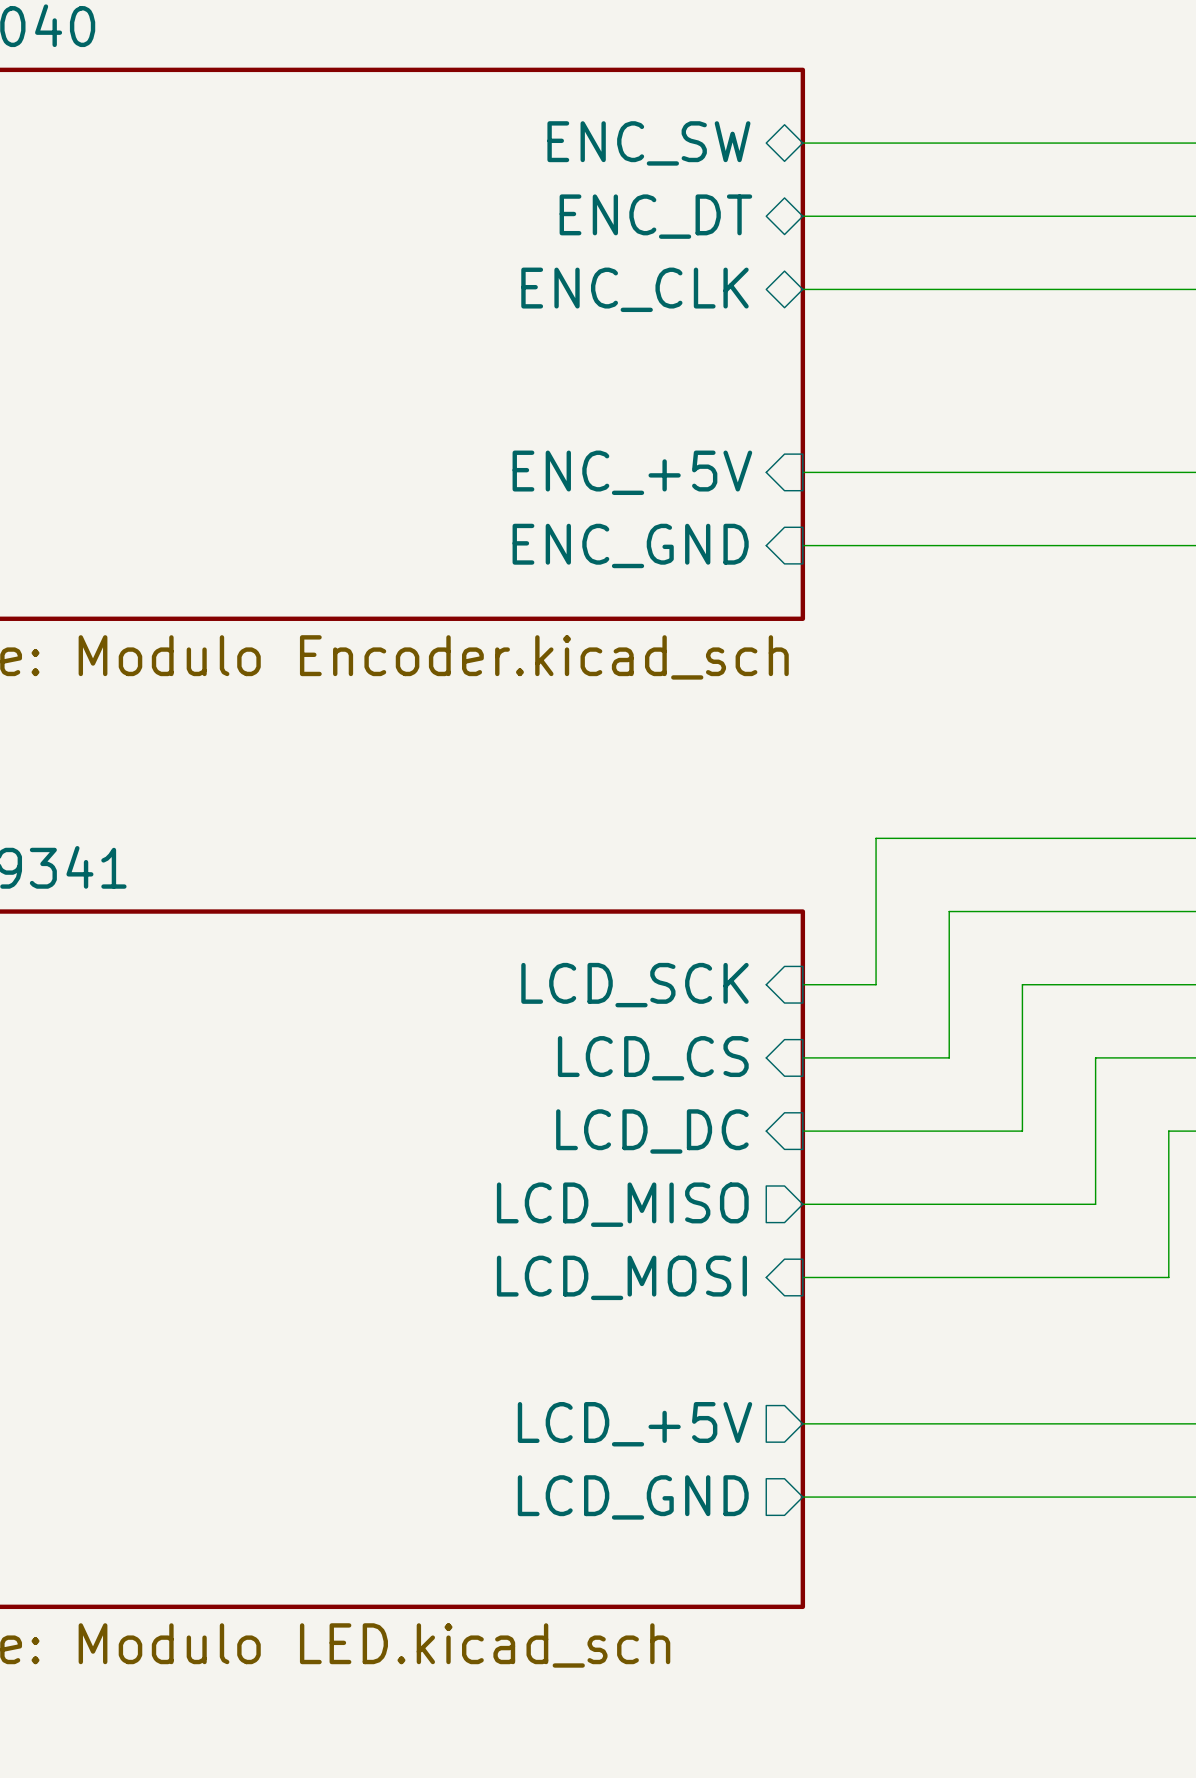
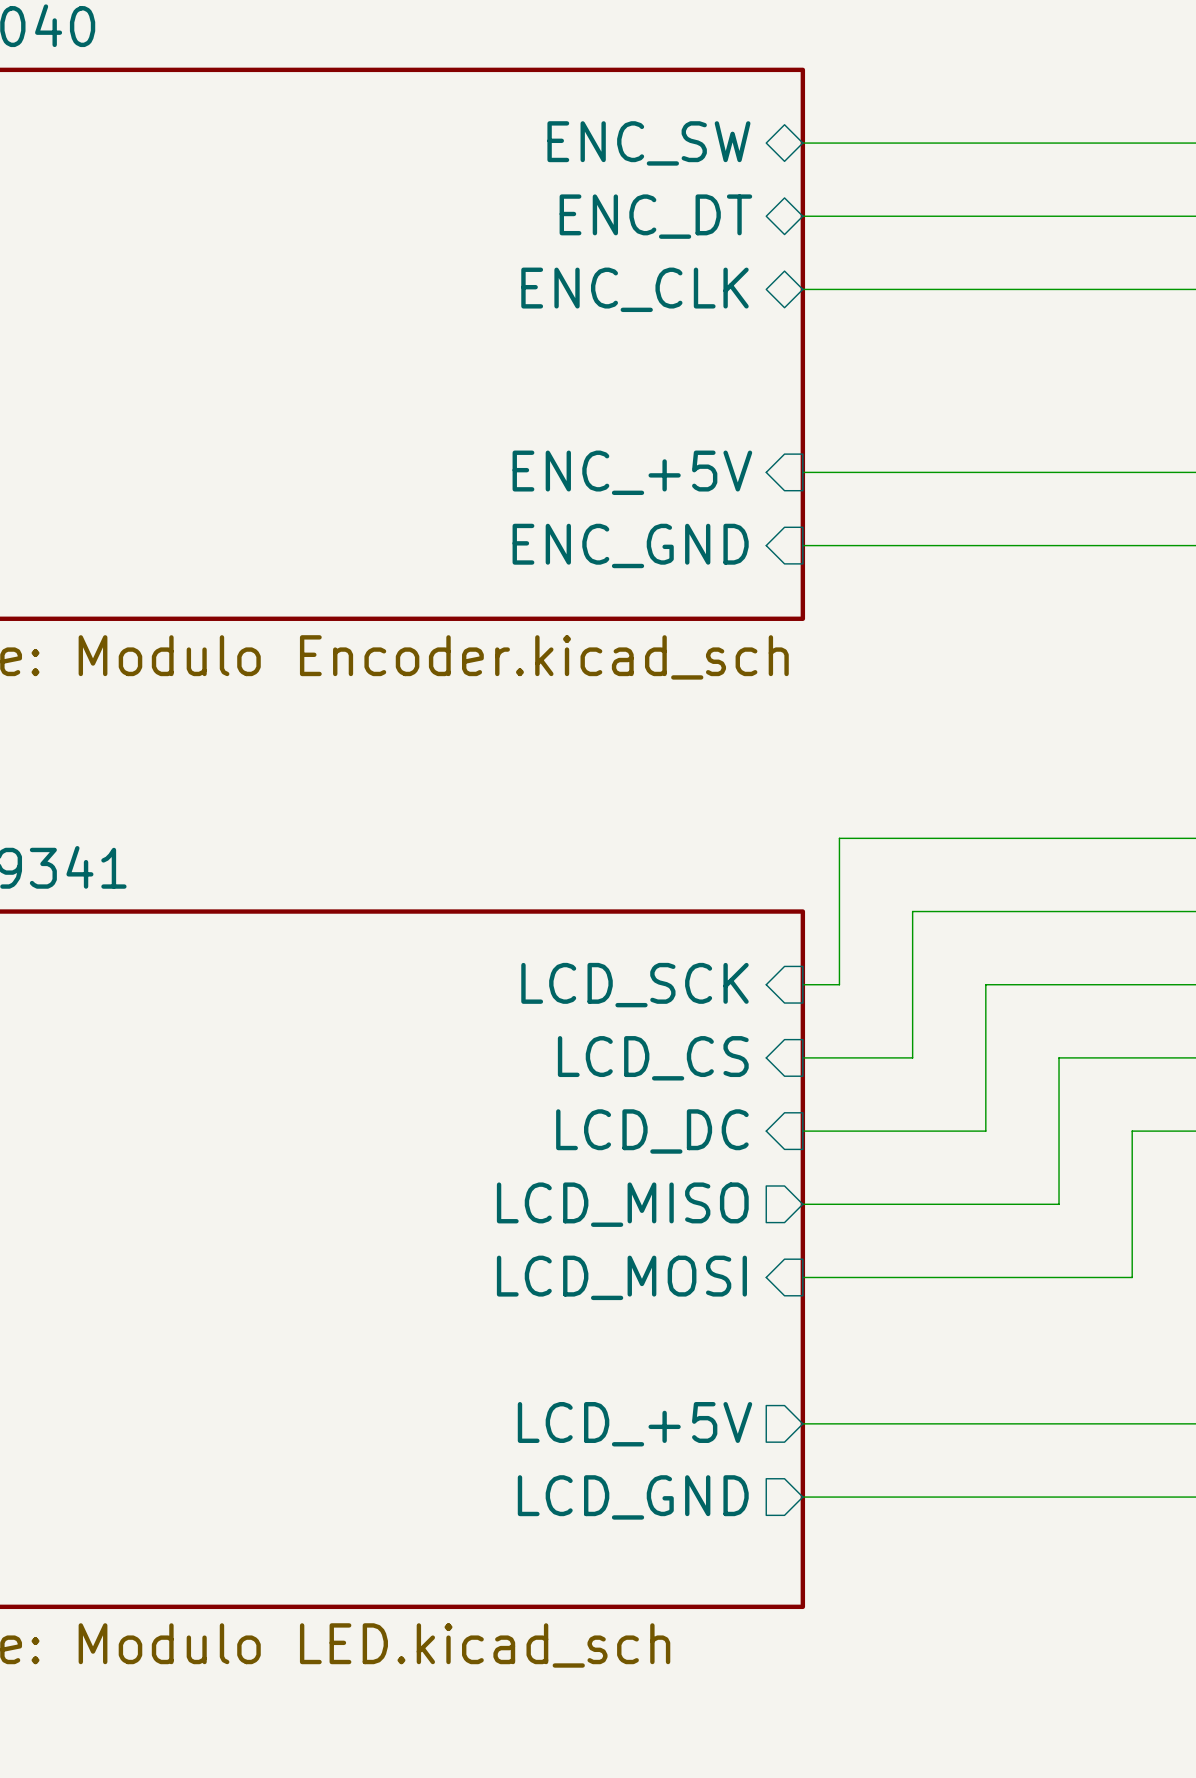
wire: (876, 838) (876, 984) (839, 984) -> (876, 838) (839, 838) (839, 984)
wire: (949, 911) (949, 1057) (912, 1057) -> (949, 911) (912, 911) (912, 1057)
wire: (1022, 984) (1022, 1131) (985, 1131) -> (1022, 984) (985, 984) (985, 1131)
wire: (1095, 1057) (1095, 1204) (1059, 1204) -> (1095, 1057) (1059, 1057) (1059, 1204)
wire: (1168, 1131) (1168, 1277) (1132, 1277) -> (1168, 1131) (1132, 1131) (1132, 1277)

